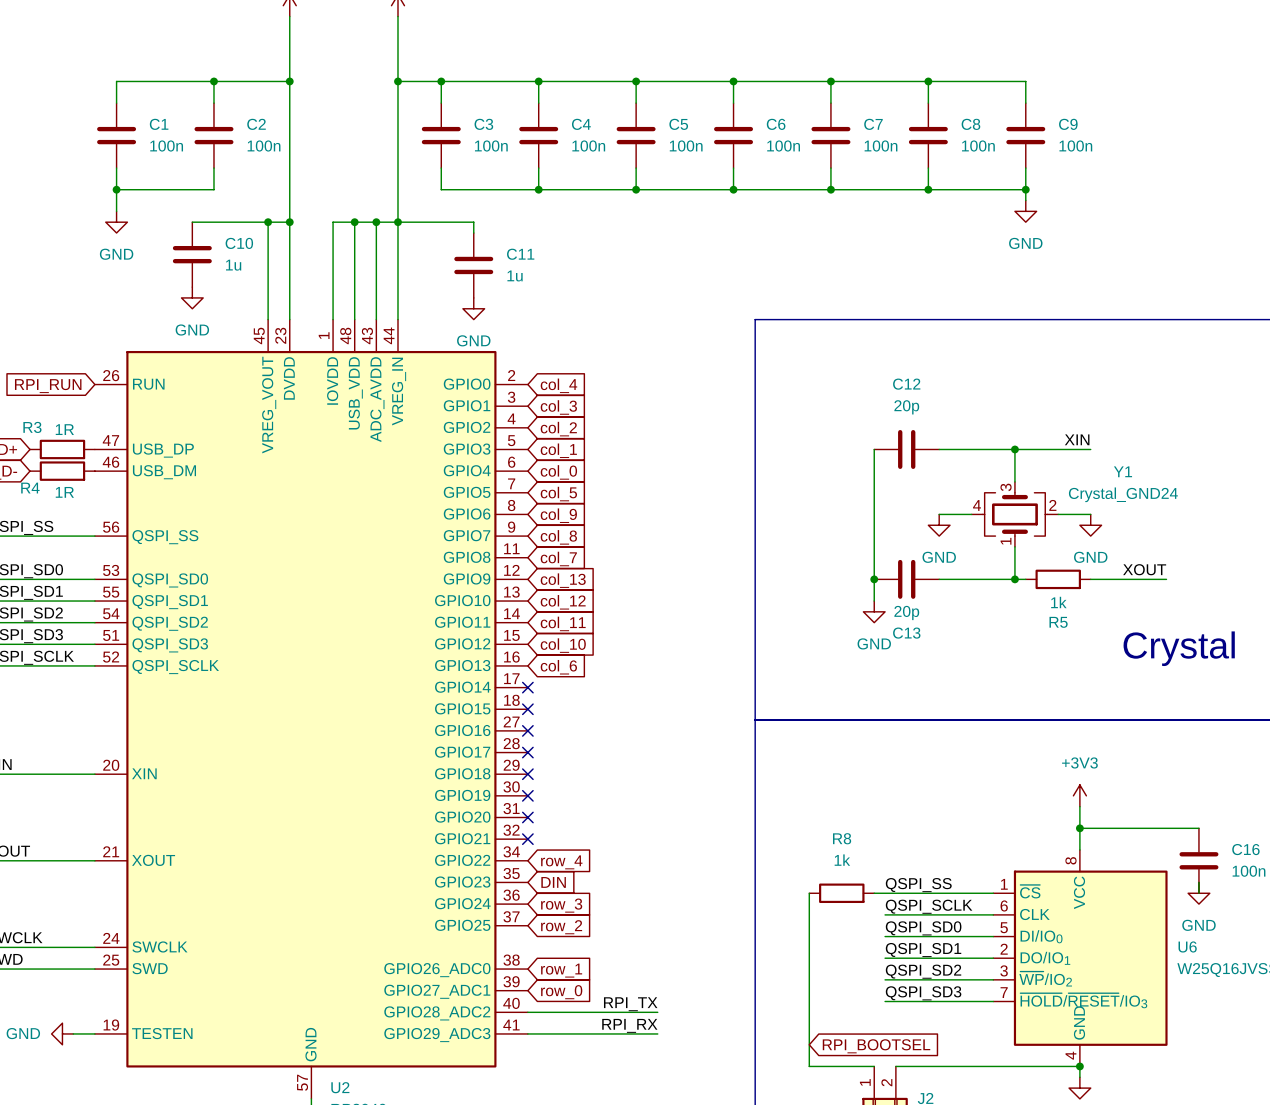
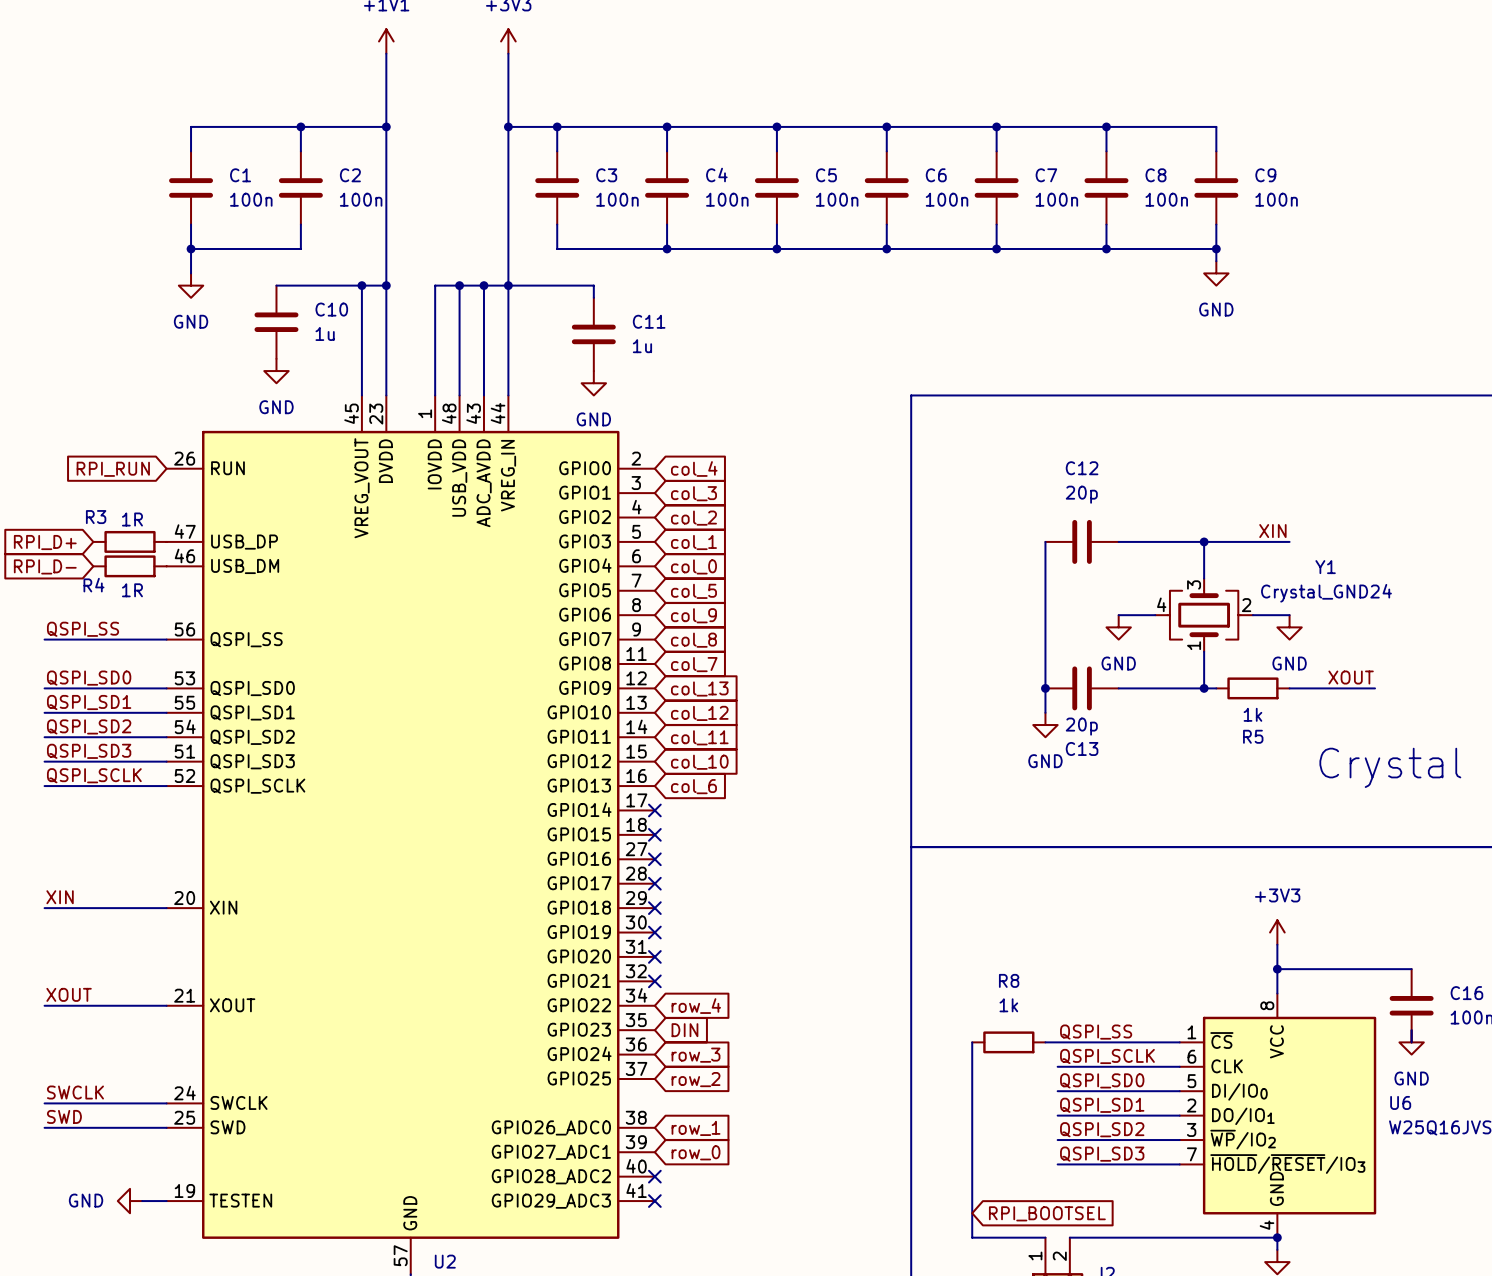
label: RPI_TX (630, 1004) -> none
wire: (527, 1012) (657, 1012) -> none
no-connect mark: none -> (654, 1176)
label: RPI_RX (629, 1025) -> none
wire: (527, 1033) (657, 1033) -> none
no-connect mark: none -> (654, 1201)

